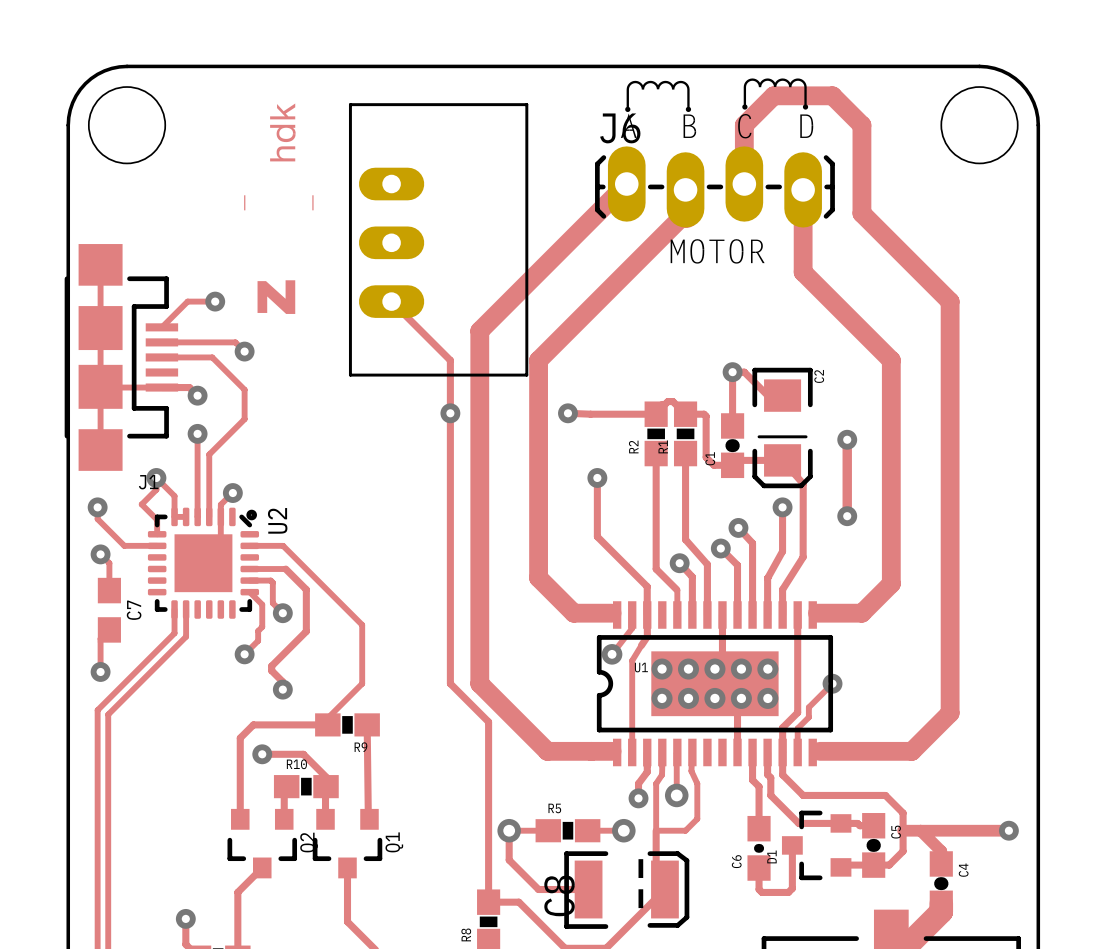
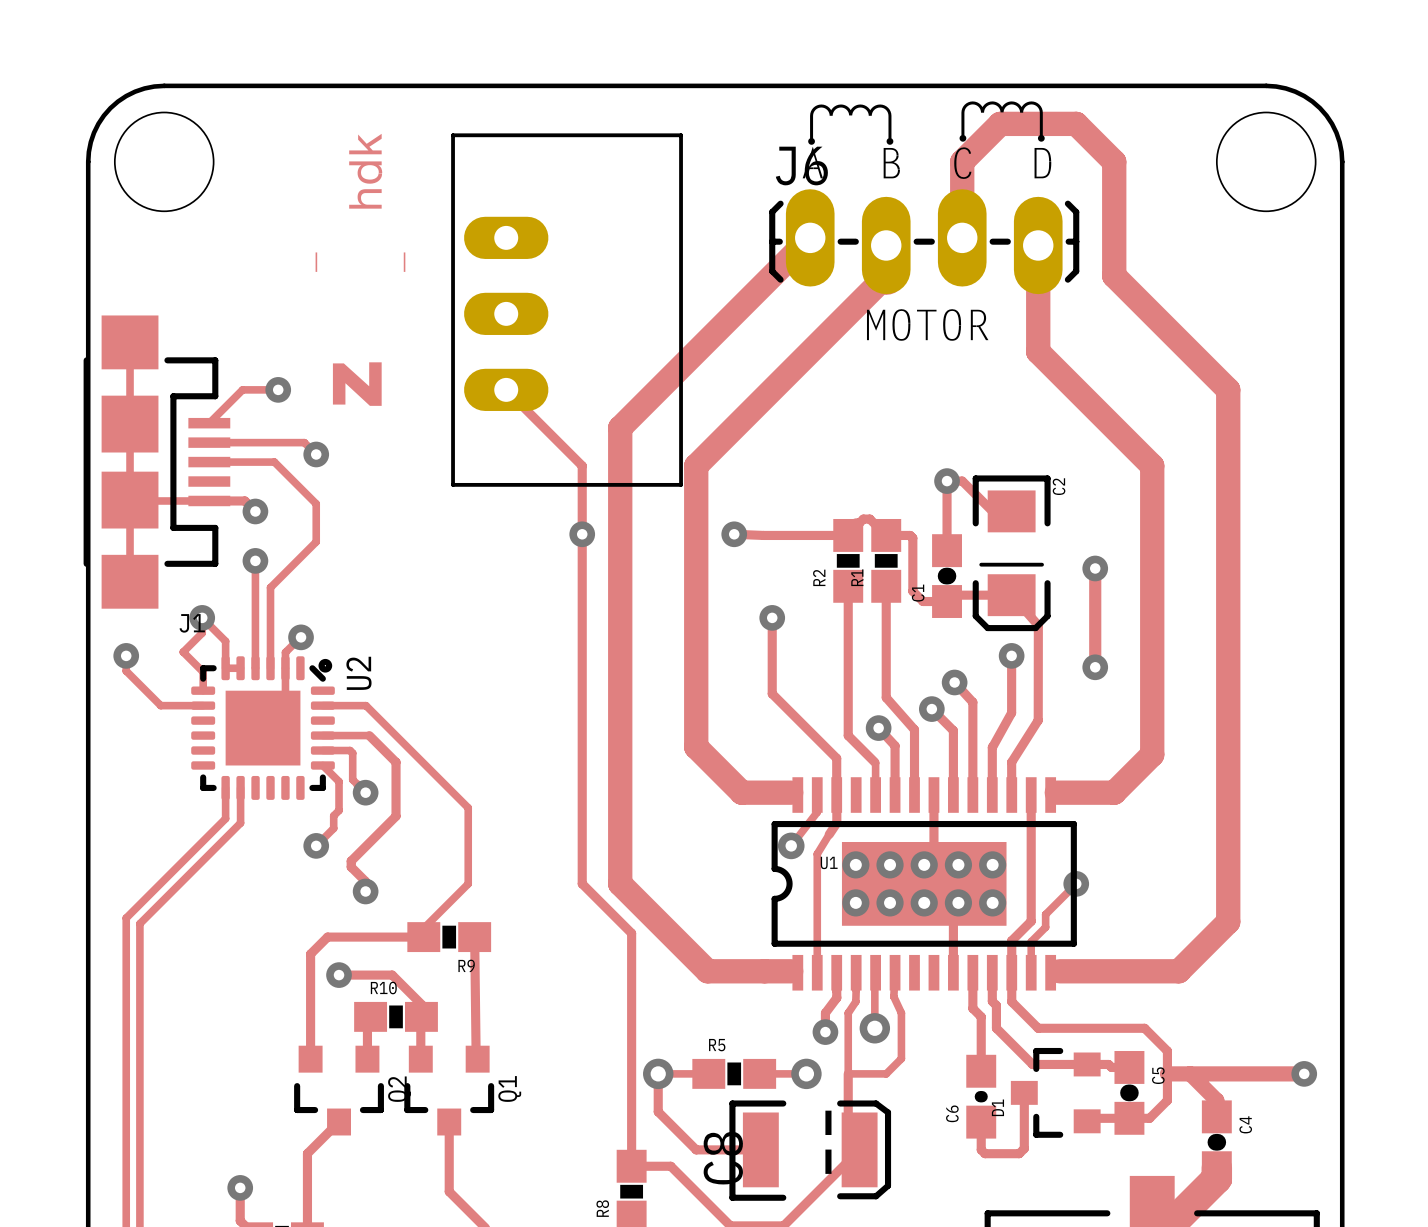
track: (100, 554) (109, 563) (109, 590) -> none
via: (100, 554) -> none
C7: (109, 610) -> none
track: (109, 629) (100, 638) (100, 671) -> none
via: (100, 671) -> none

